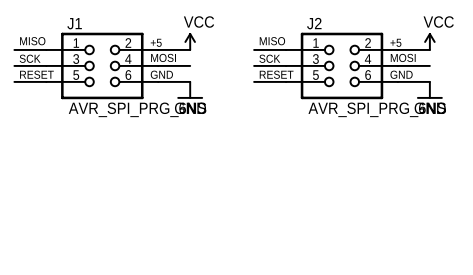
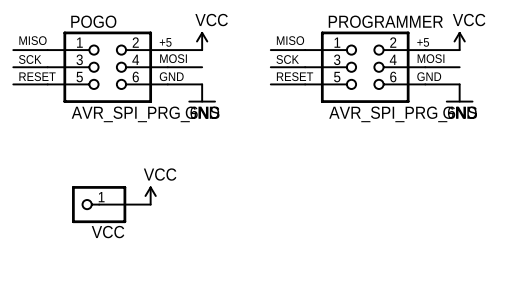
J1 name: J1 (74, 23) -> POGO (93, 21)
J2 name: J2 (314, 23) -> PROGRAMMER (385, 21)
power symbol: none -> VCC (150, 195)
wire: none -> (99, 204) (150, 204)
VCC: none -> (99, 204)

